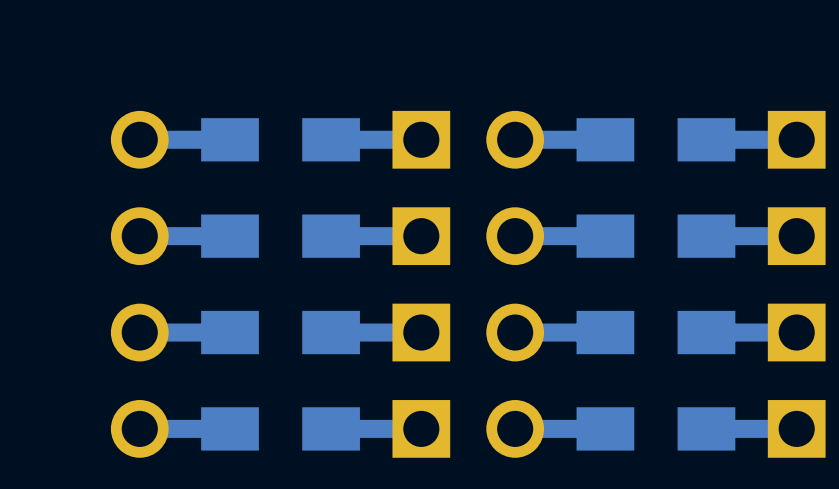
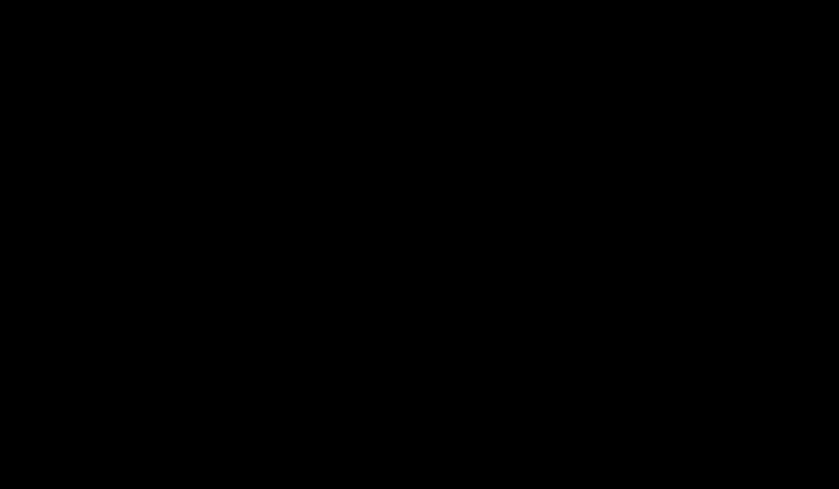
part: (280, 139) -> none
part: (655, 139) -> none
part: (280, 236) -> none
part: (655, 236) -> none
part: (280, 332) -> none
part: (655, 332) -> none
part: (280, 428) -> none
part: (655, 428) -> none

